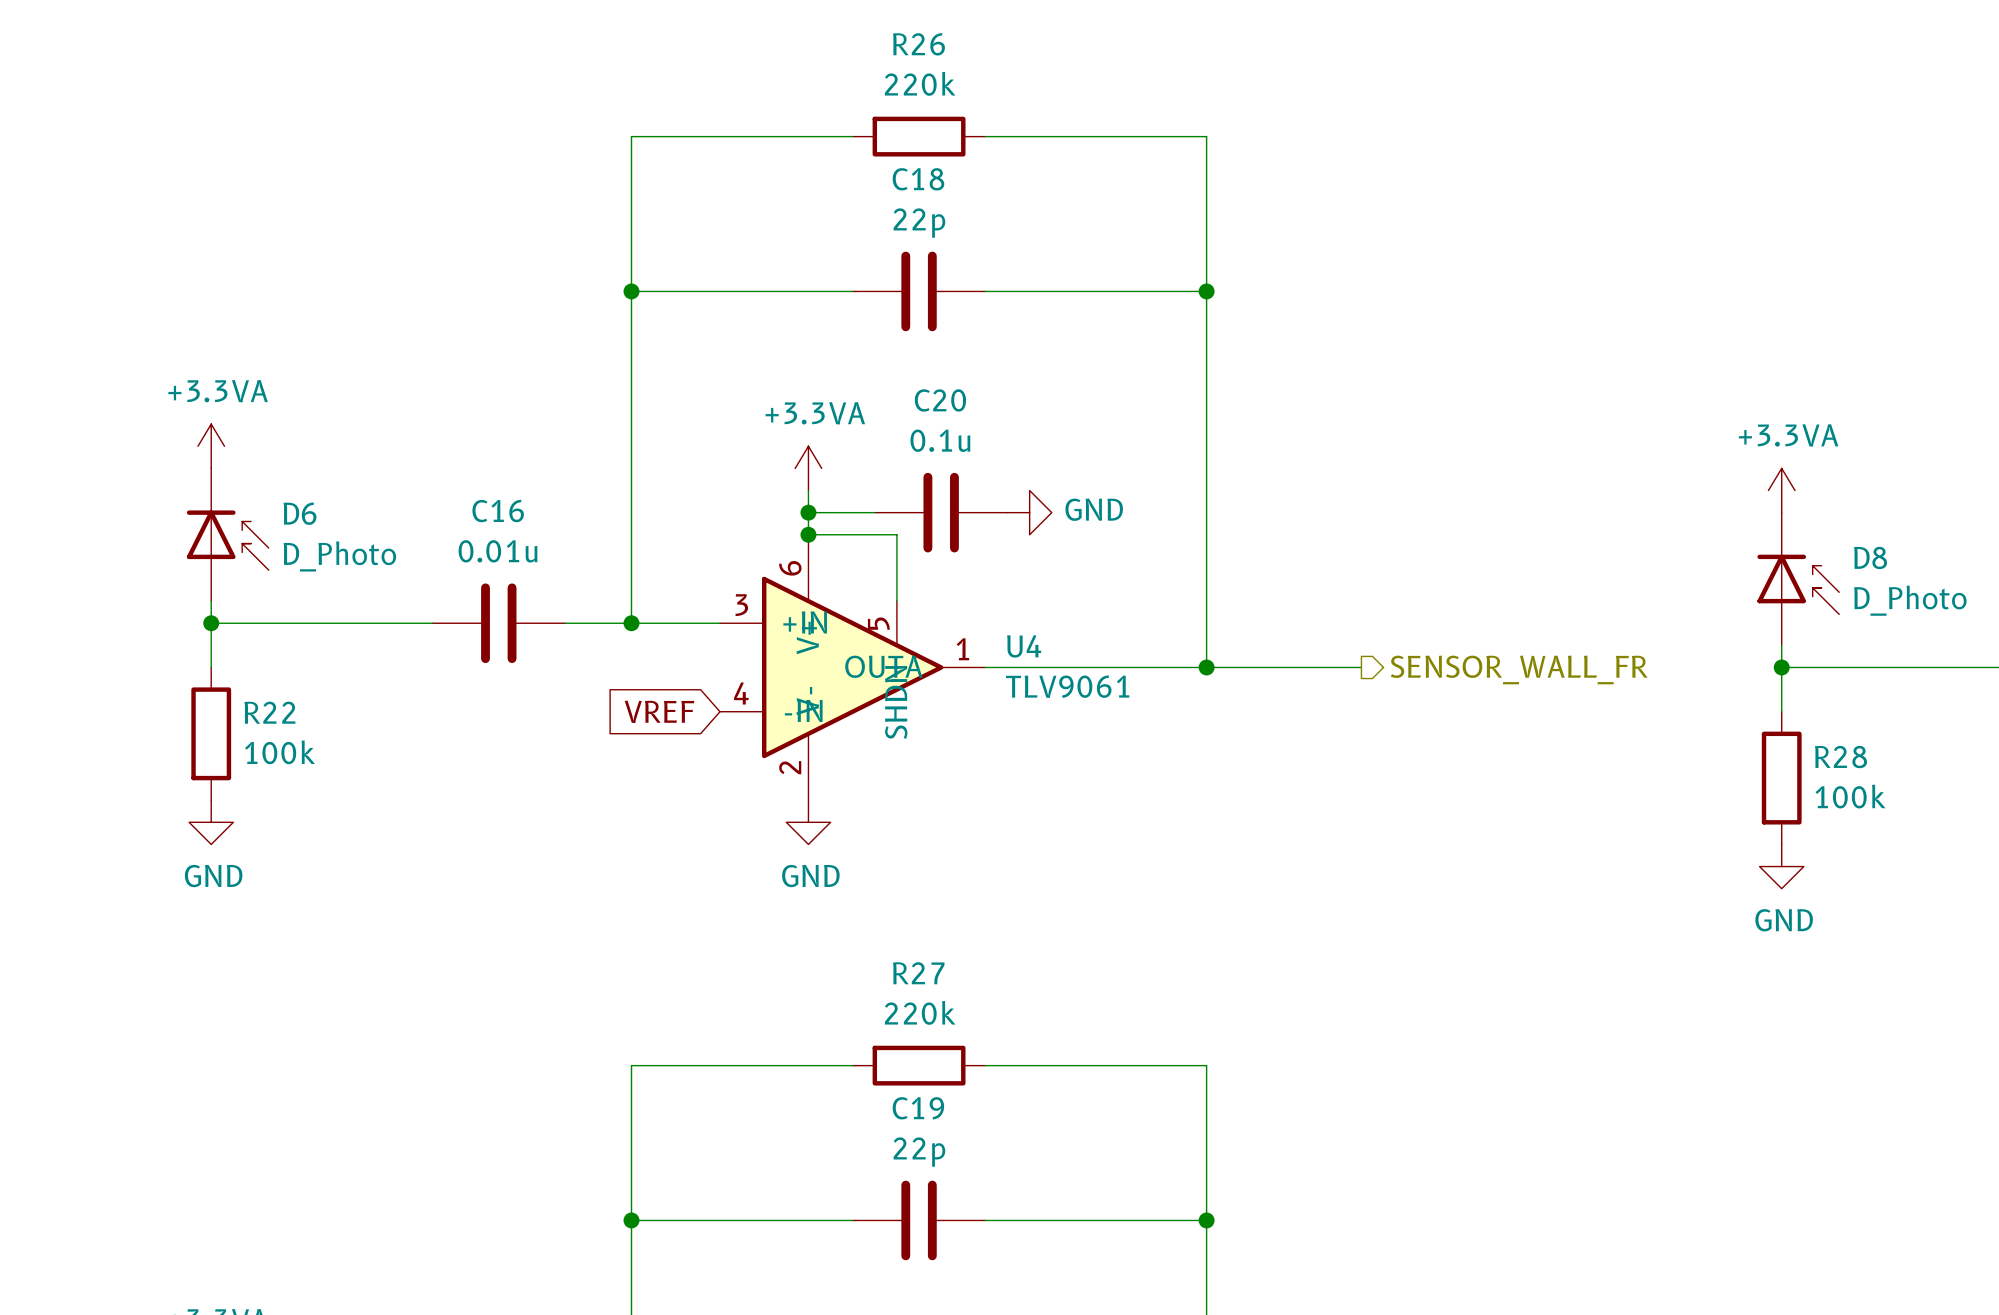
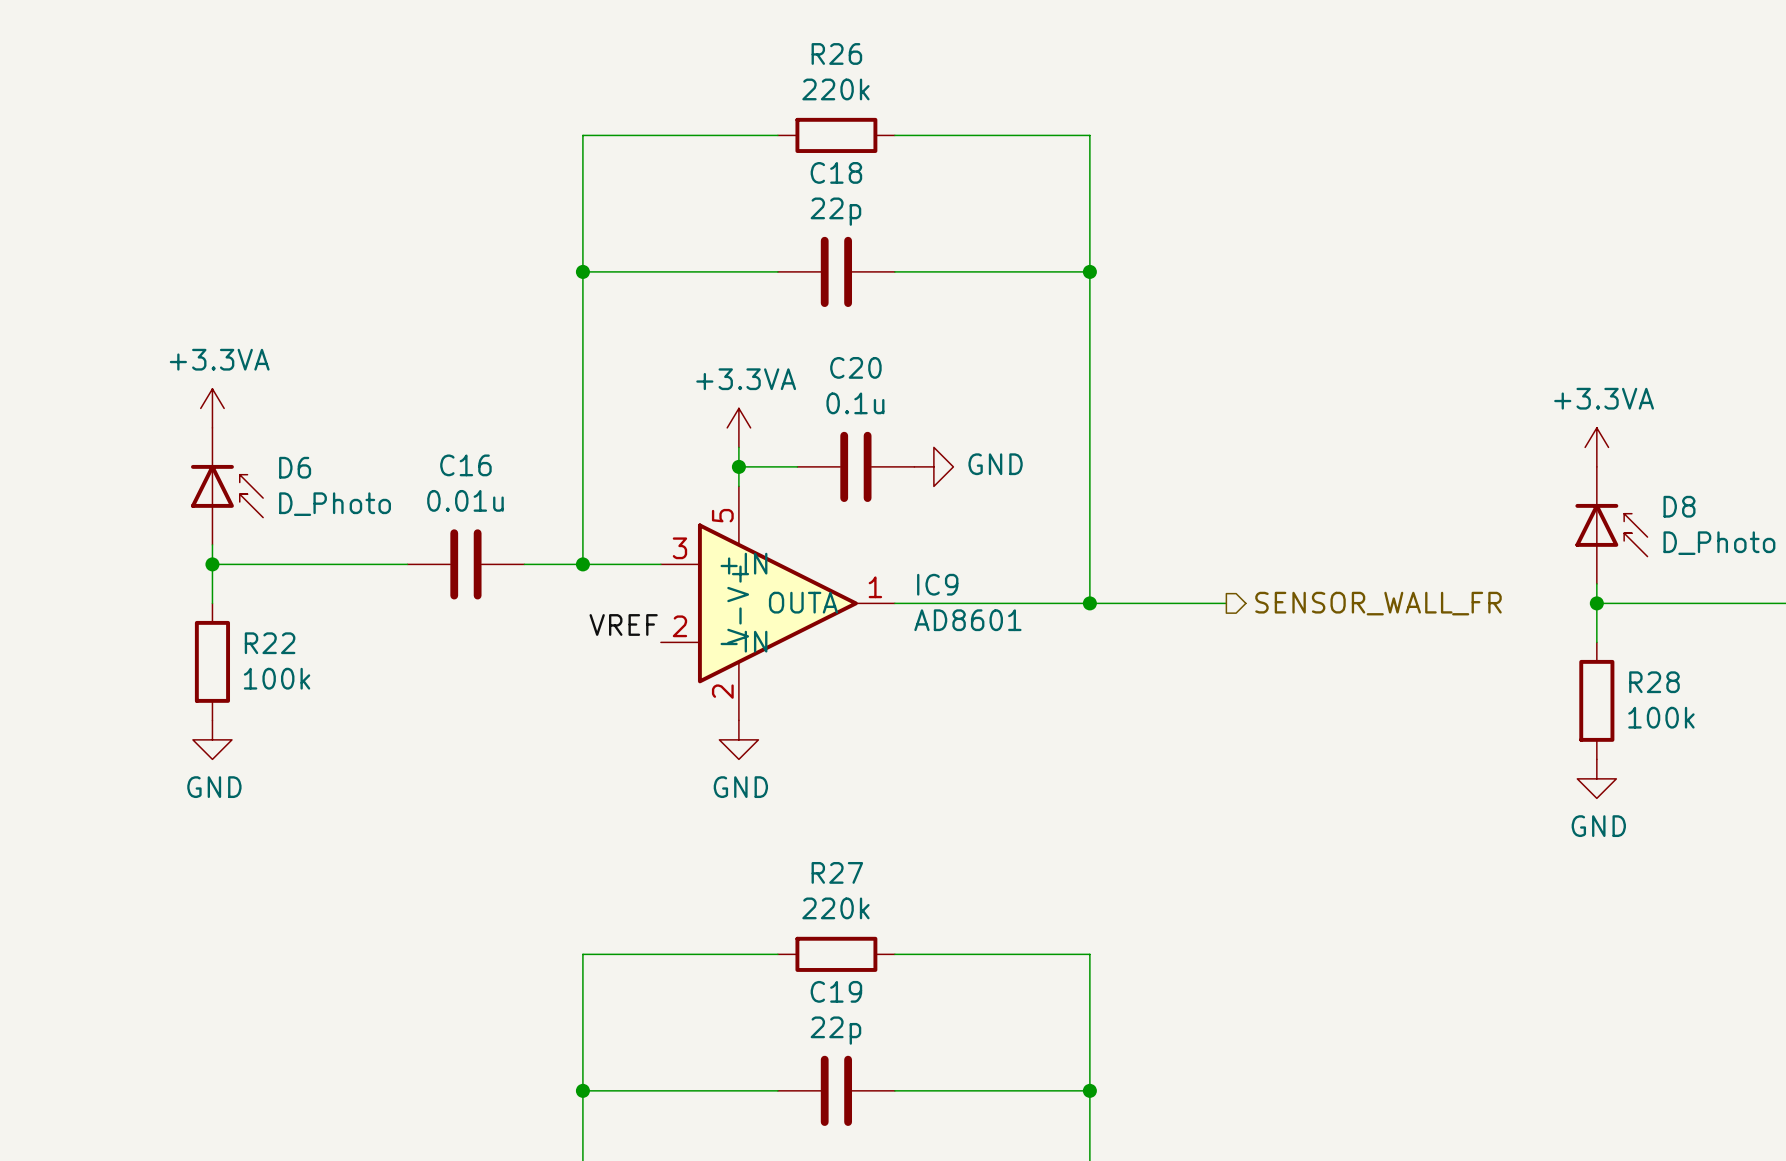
wire: (808, 534) (896, 534) (896, 601) -> none
junction: (808, 534) -> none
U4: TLV9061 (852, 667) -> none
IC9: none -> AD8601 (777, 603)
label: none -> VREF (623, 624)
global label: VREF (659, 711) -> none

